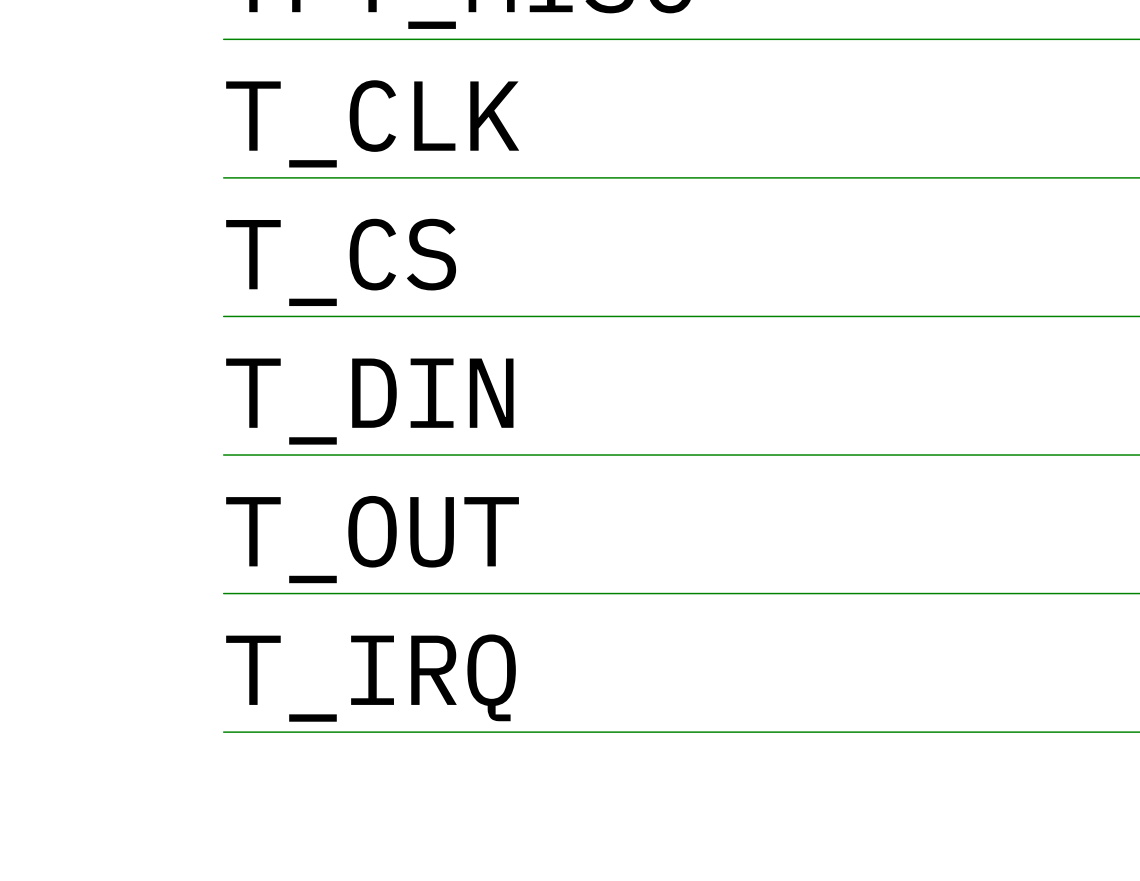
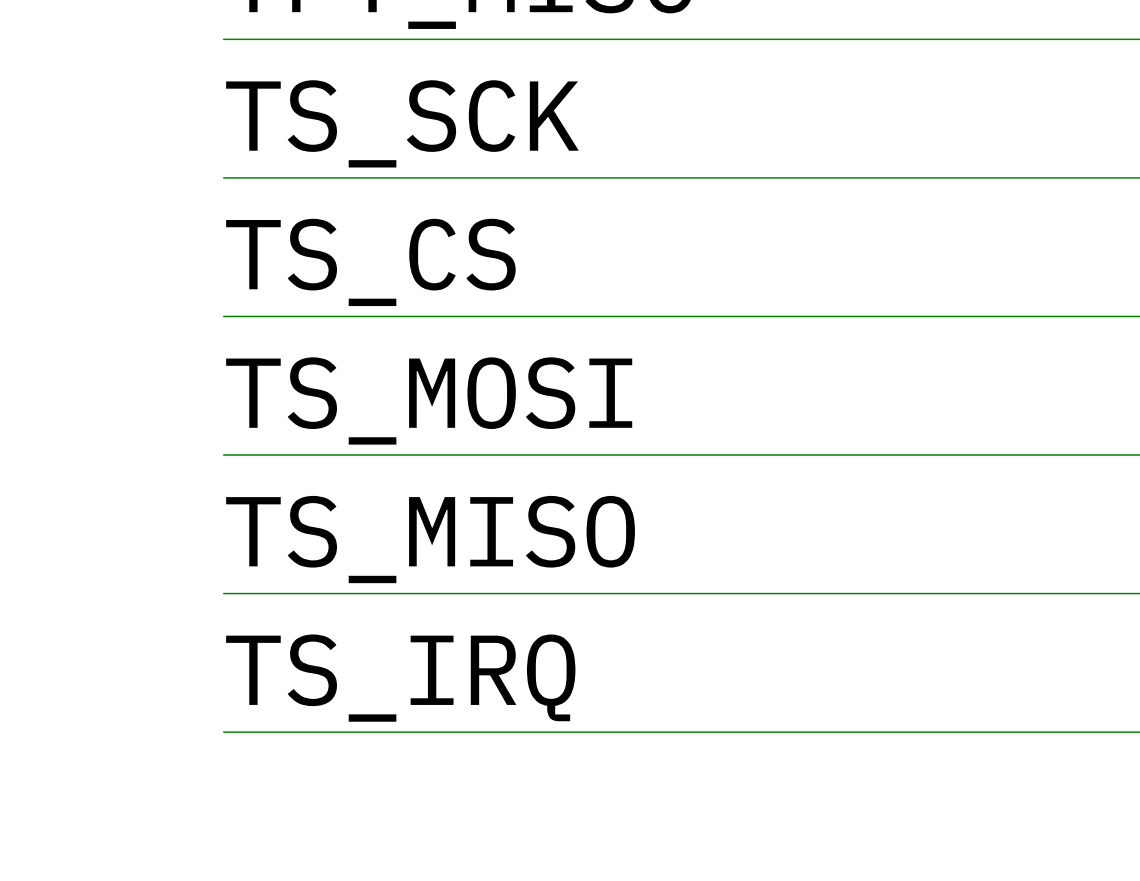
label: T_CLK (372, 123) -> TS_SCK (402, 123)
label: T_CS (341, 262) -> TS_CS (370, 262)
label: T_DIN (369, 401) -> TS_MOSI (429, 400)
label: T_OUT (372, 539) -> TS_MISO (430, 539)
label: T_IRQ (371, 678) -> TS_IRQ (400, 678)

